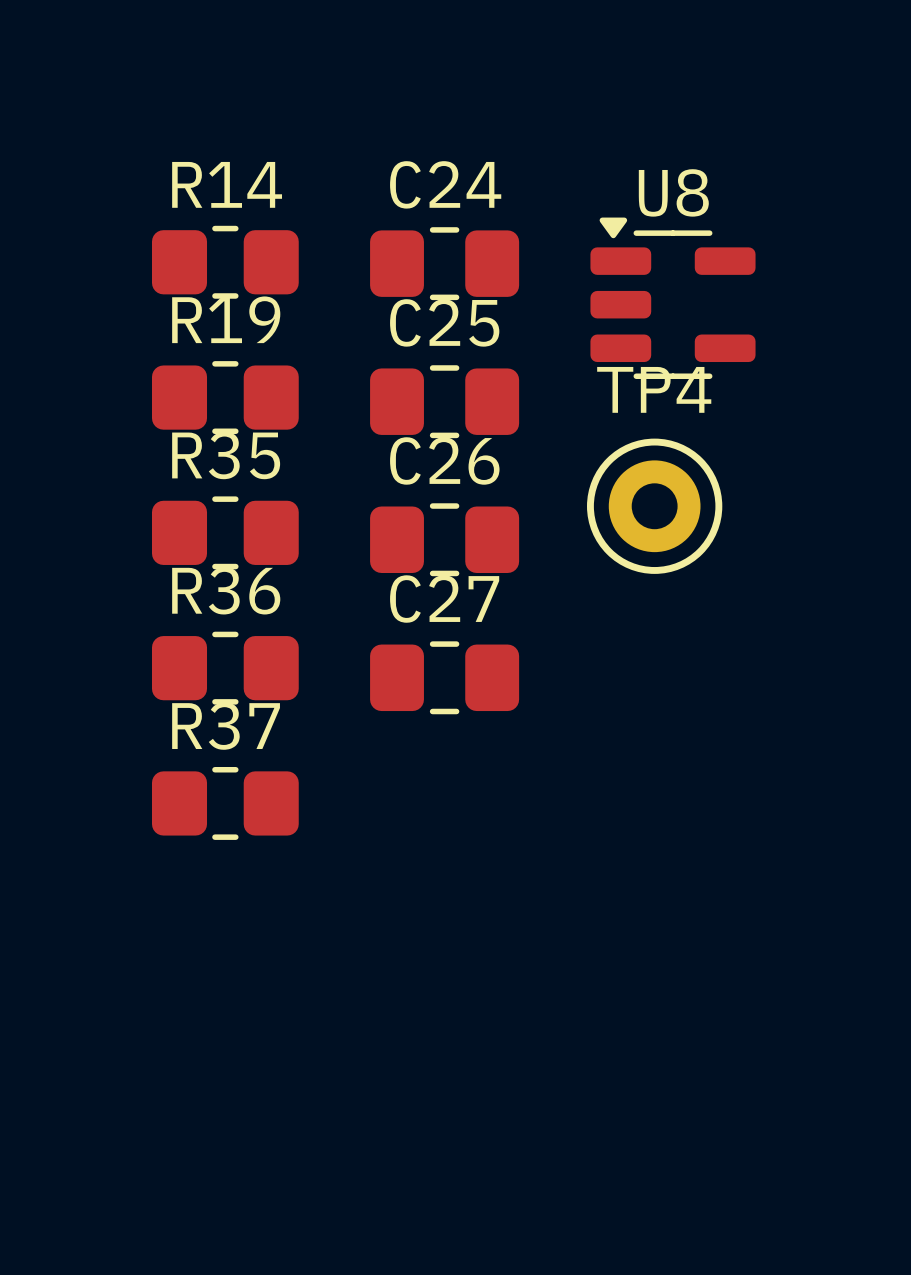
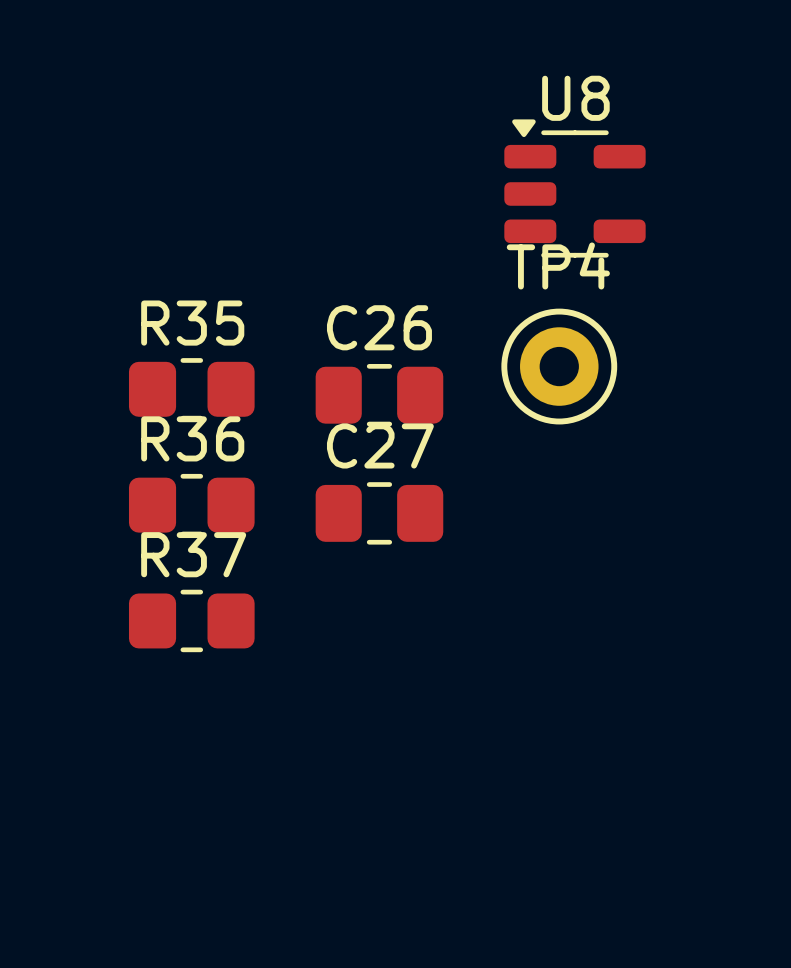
R14: (225, 262) -> none
C24: (444, 263) -> none
R19: (225, 397) -> none
C25: (444, 401) -> none

